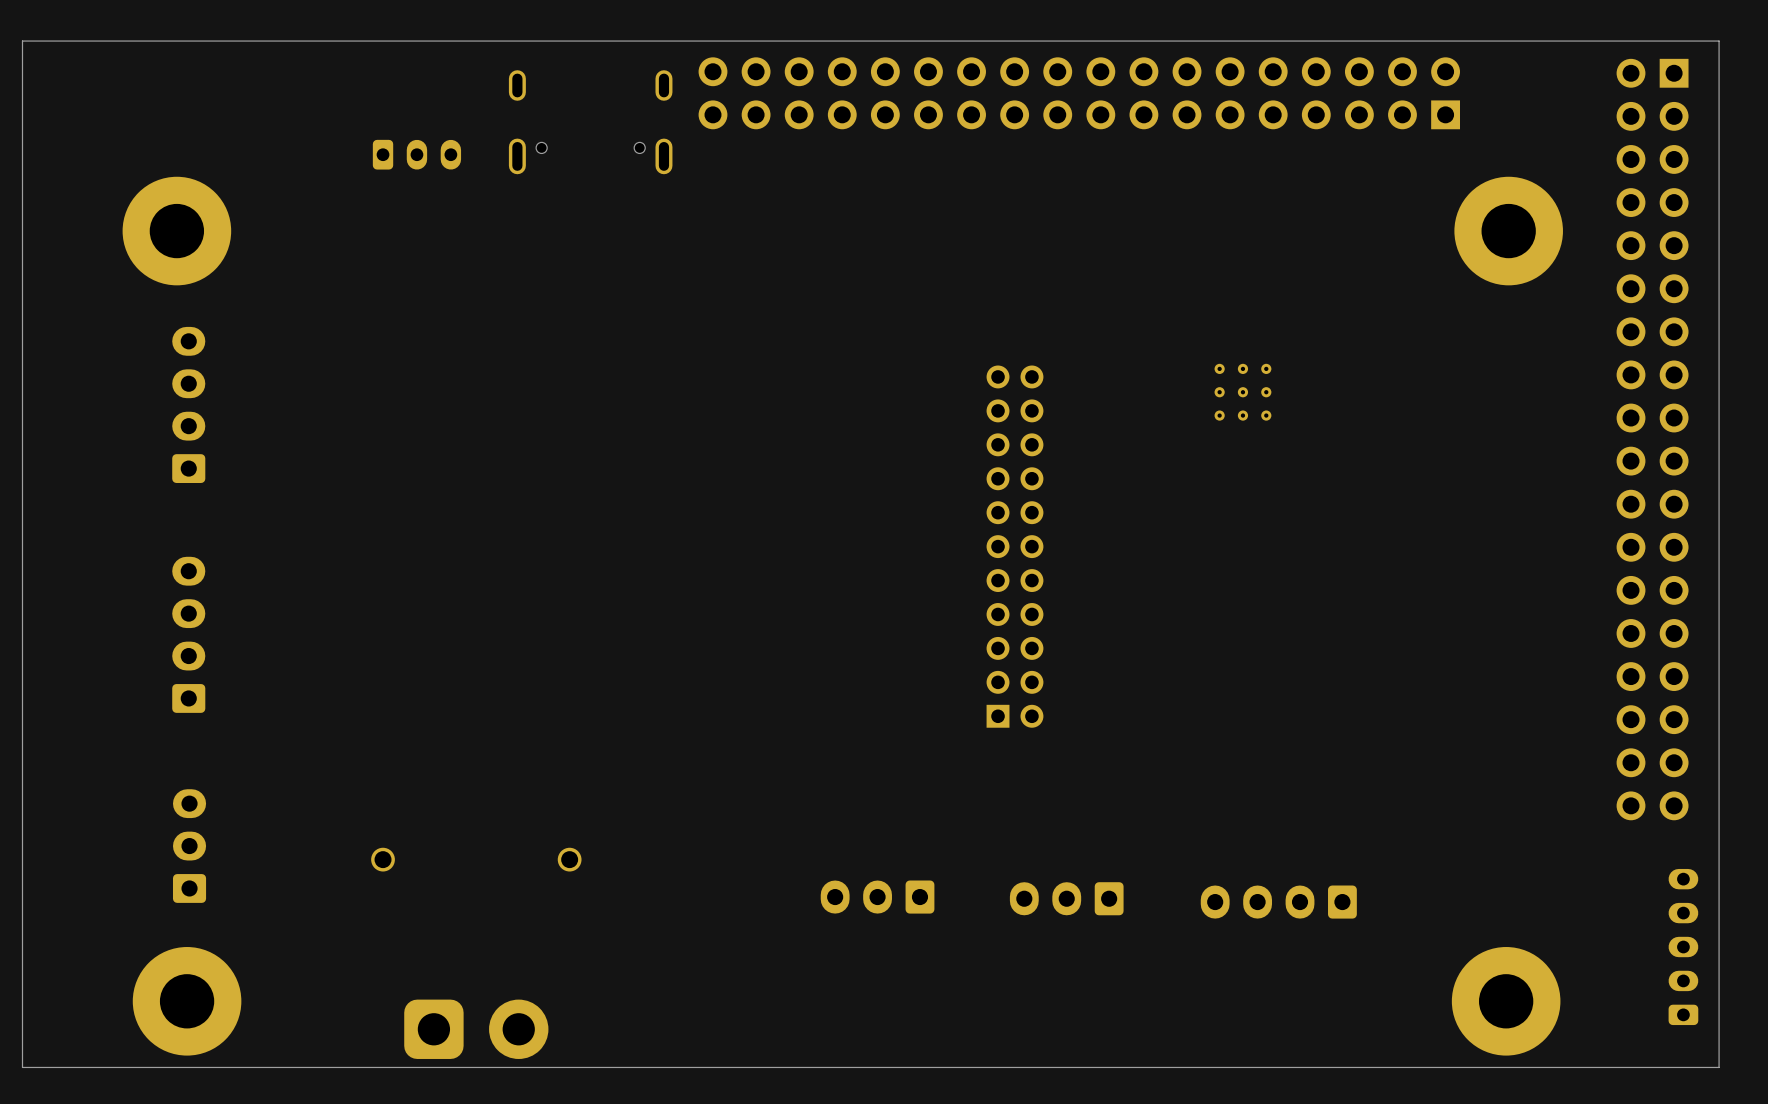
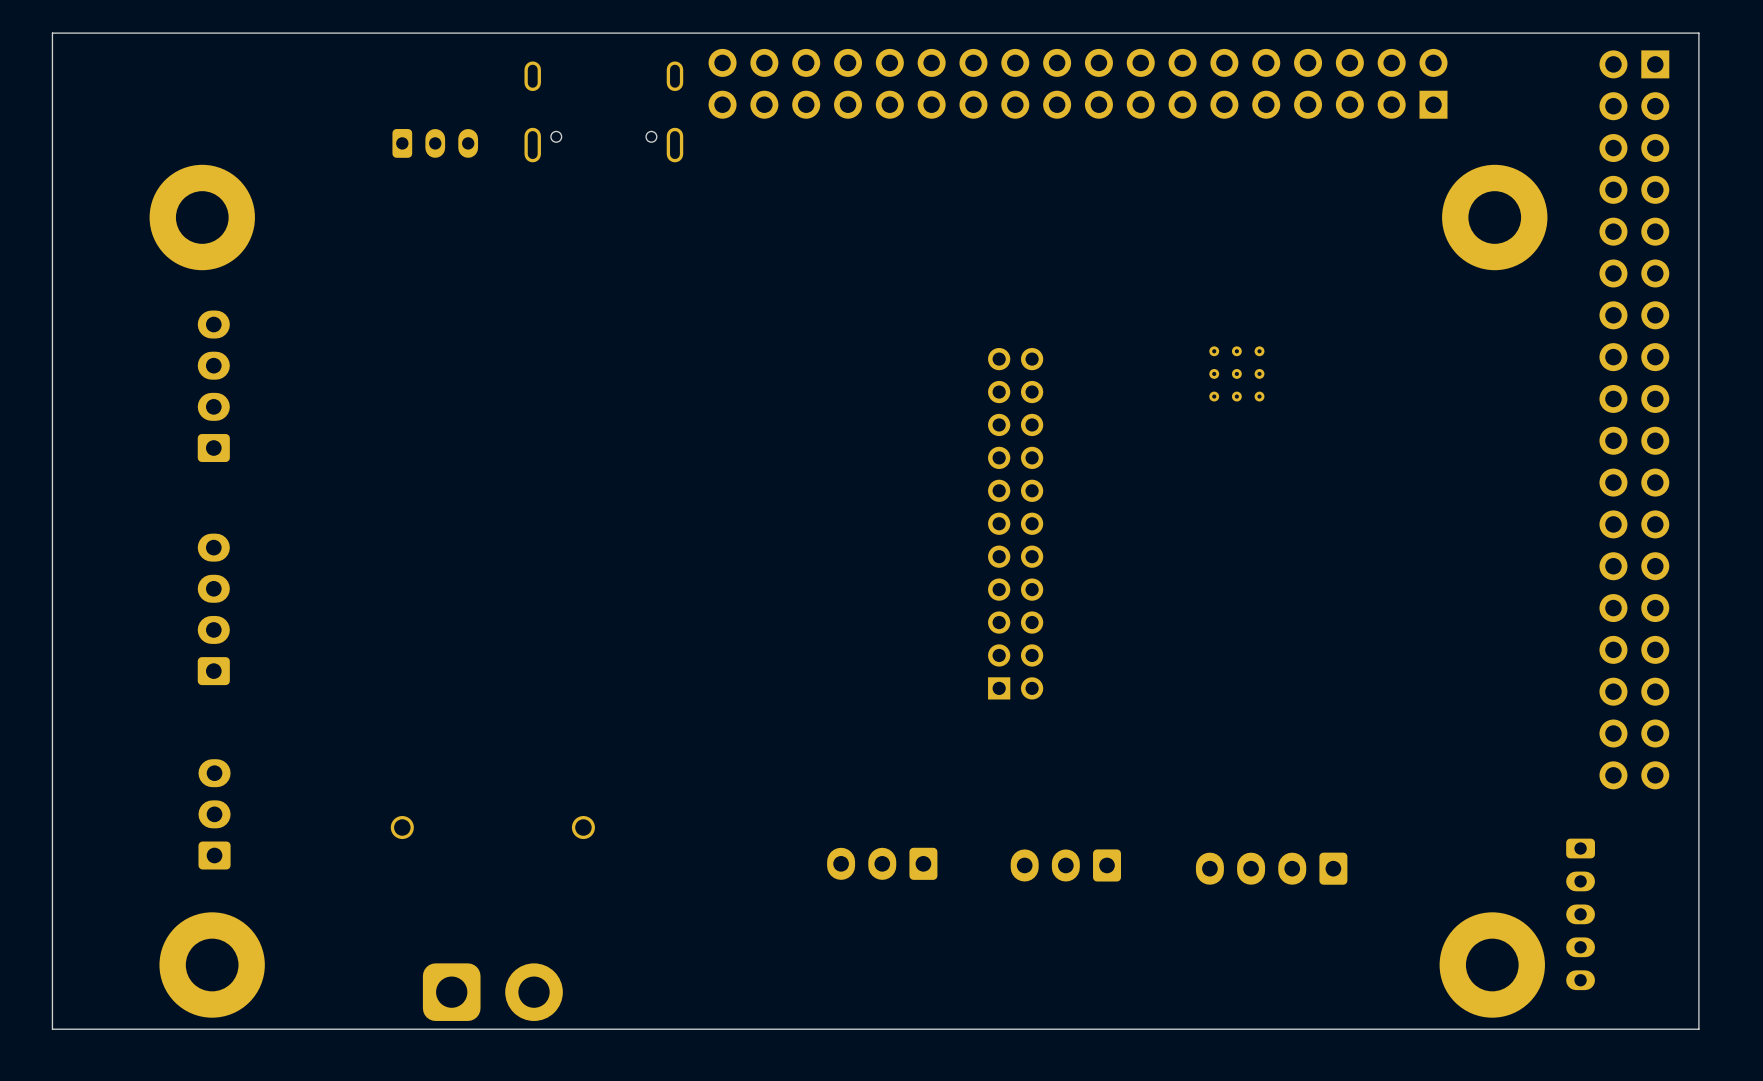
part rotation: 0° (1683, 947) -> 180° (1580, 914)

